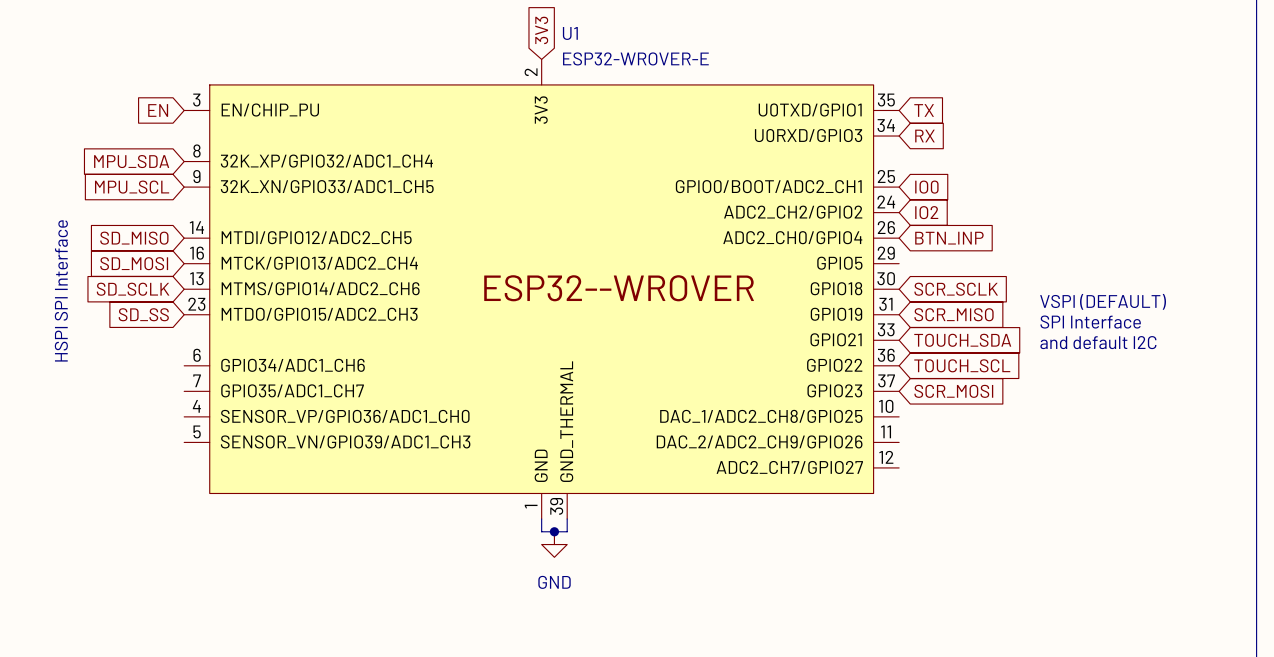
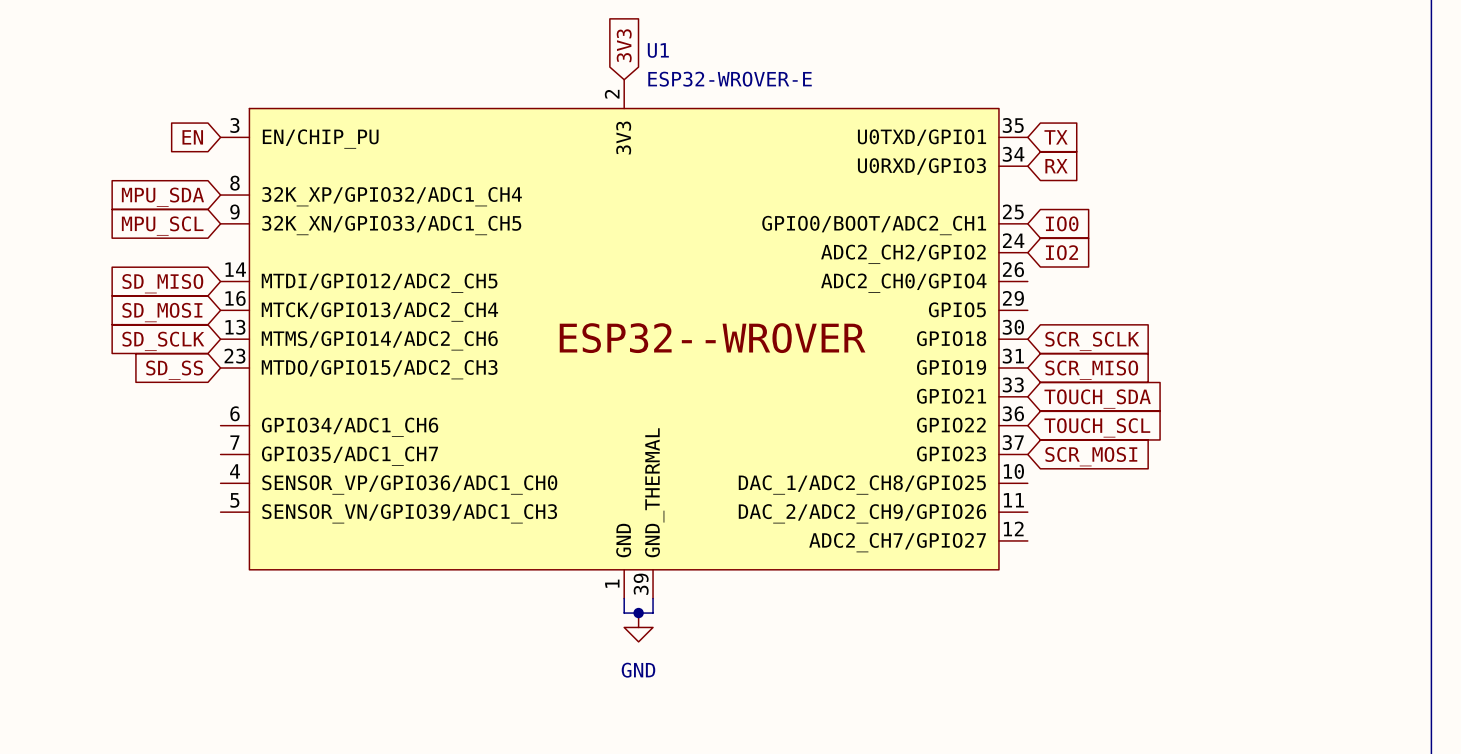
global label: BTN_INP (949, 238) -> none
text: HSPI SPI Interface (61, 290) -> none
text: VSPI (DEFAULT) (1103, 301) -> none
text: SPI Interface (1090, 322) -> none
text: and default I2C (1098, 342) -> none

